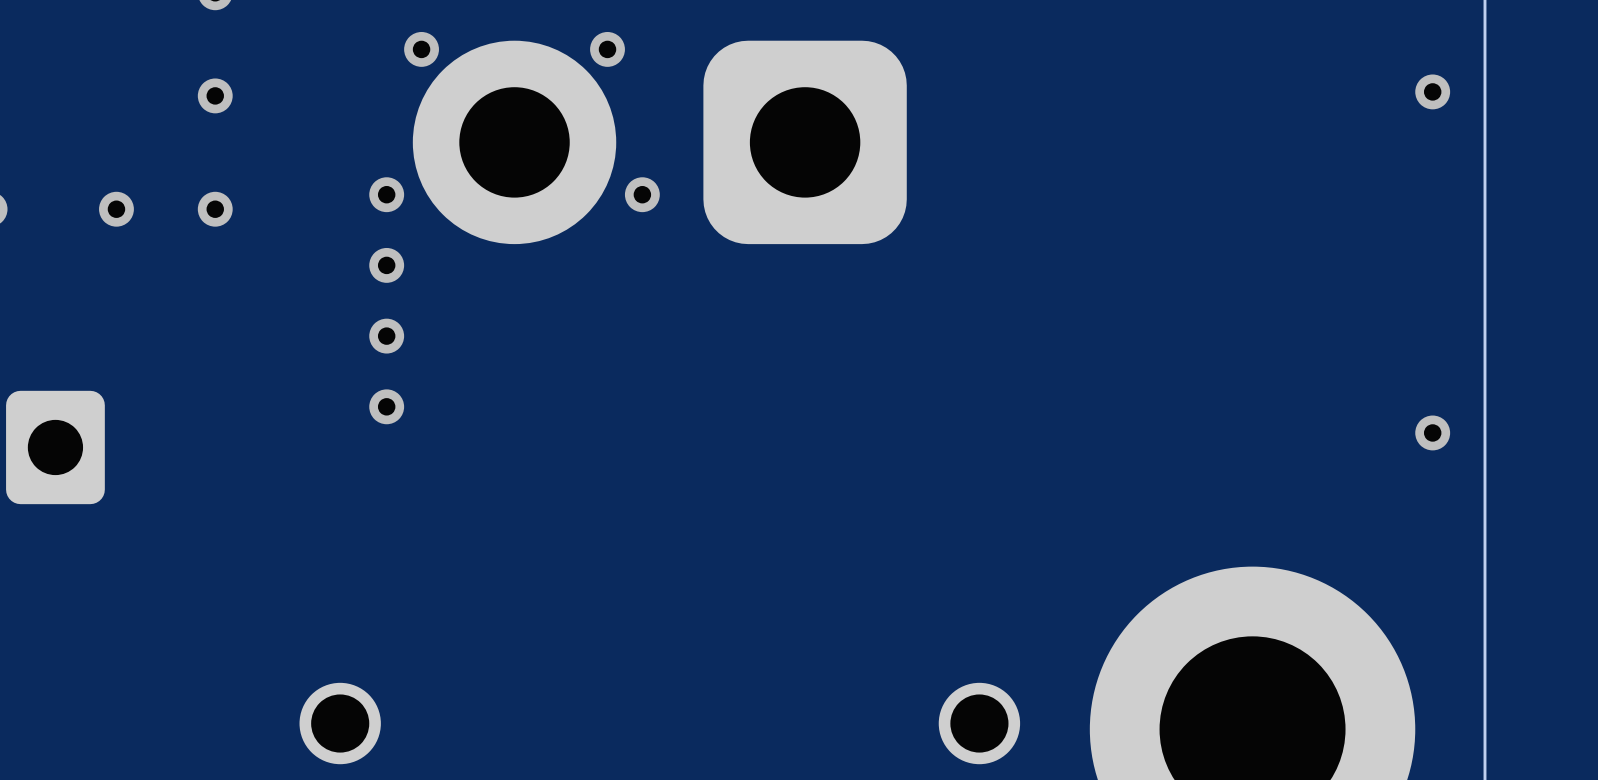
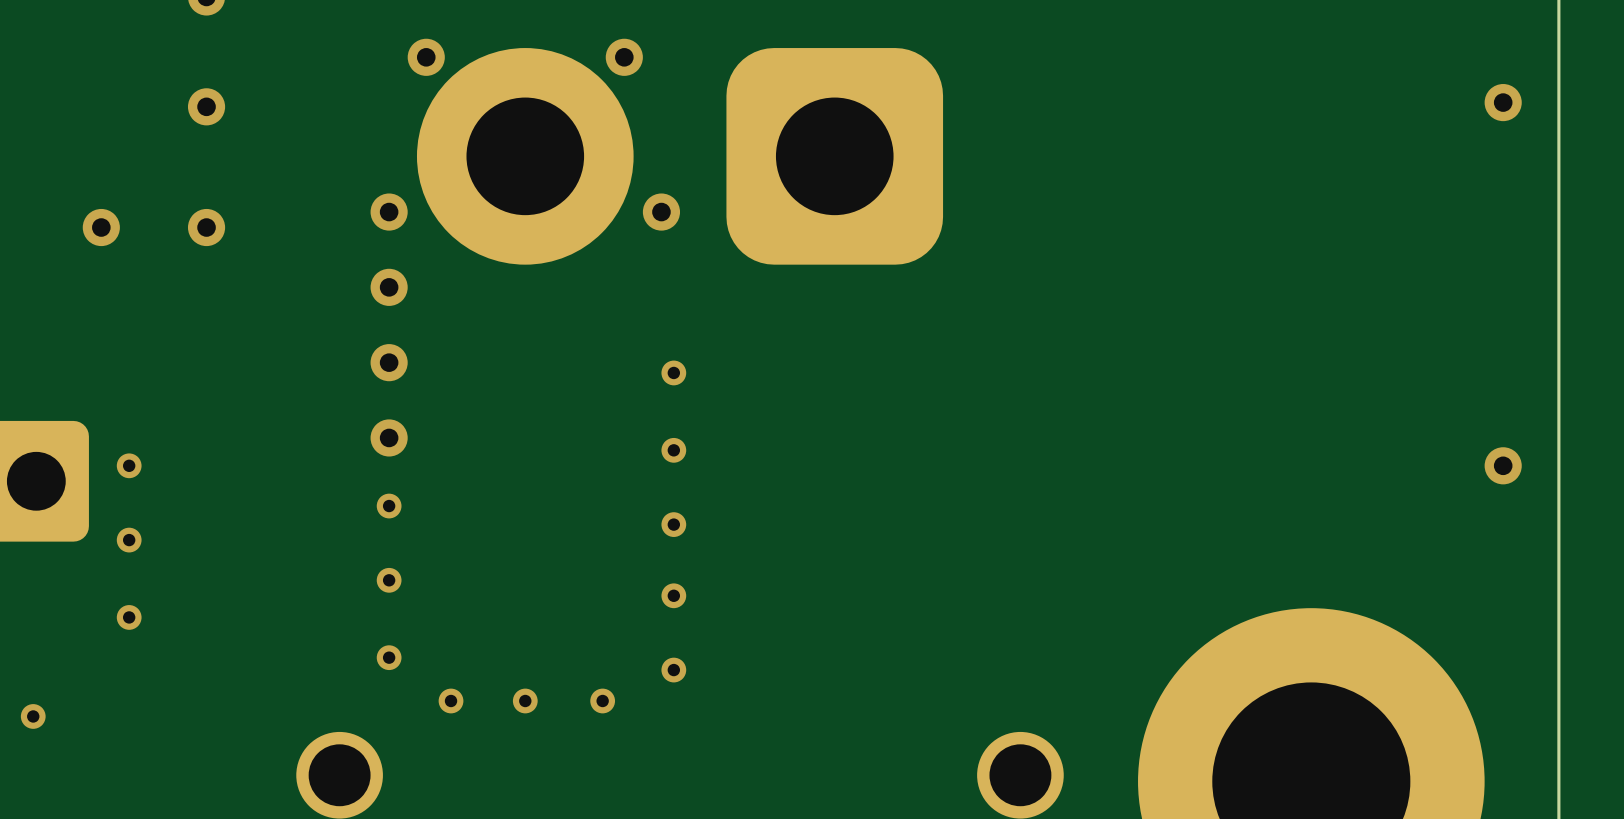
via: none -> (673, 372)
via: none -> (673, 450)
via: none -> (129, 465)
via: none -> (389, 506)
via: none -> (673, 524)
via: none -> (129, 540)
via: none -> (389, 580)
via: none -> (673, 595)
via: none -> (129, 617)
via: none -> (389, 657)
via: none -> (673, 670)
via: none -> (451, 700)
via: none -> (525, 700)
via: none -> (602, 700)
via: none -> (33, 716)

